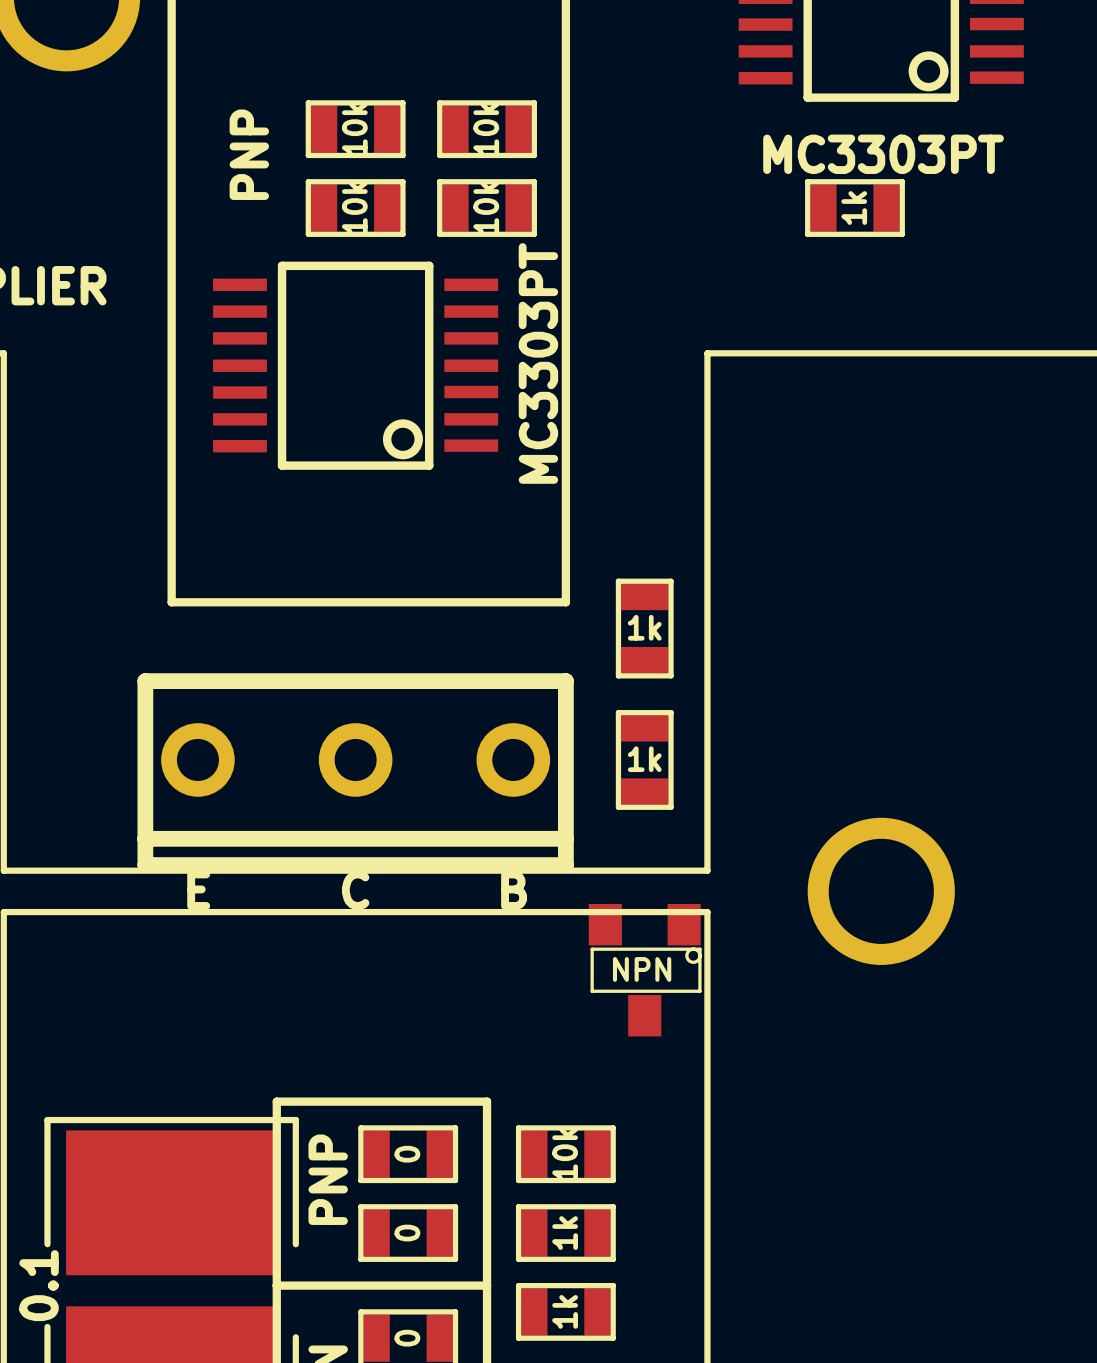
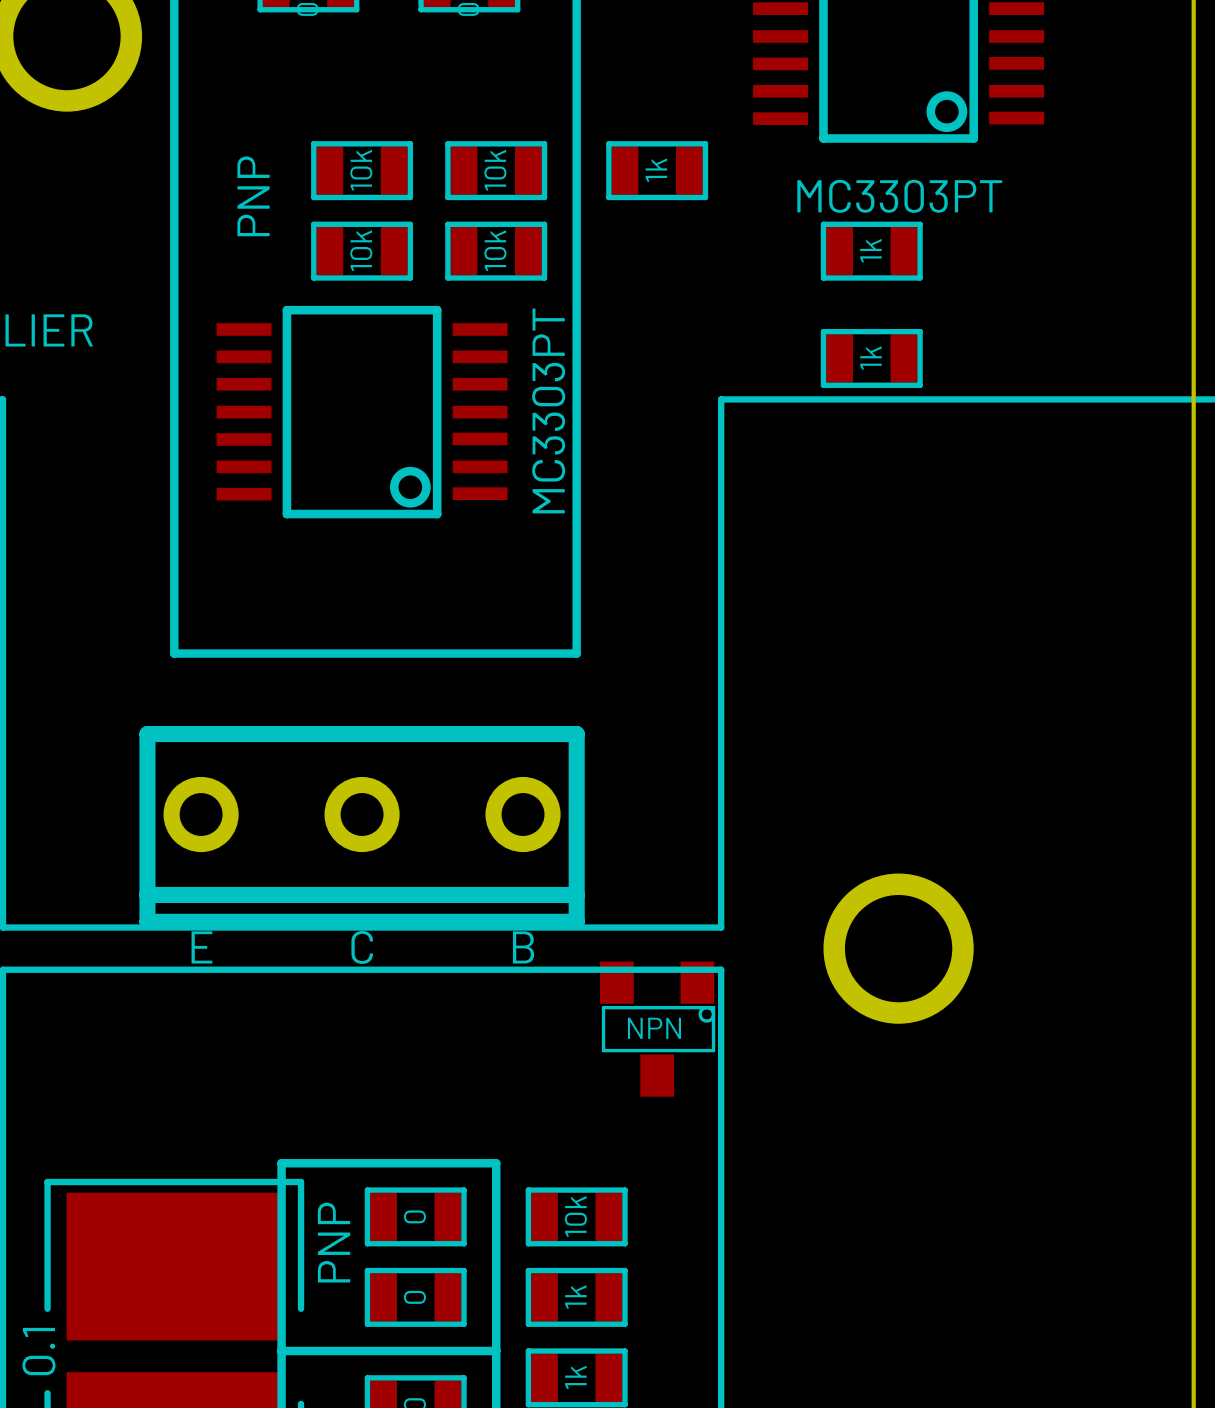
part: none -> 1k (657, 170)
part: none -> 1k (871, 358)
part: 1k (644, 628) -> none
part: 1k (644, 759) -> none

